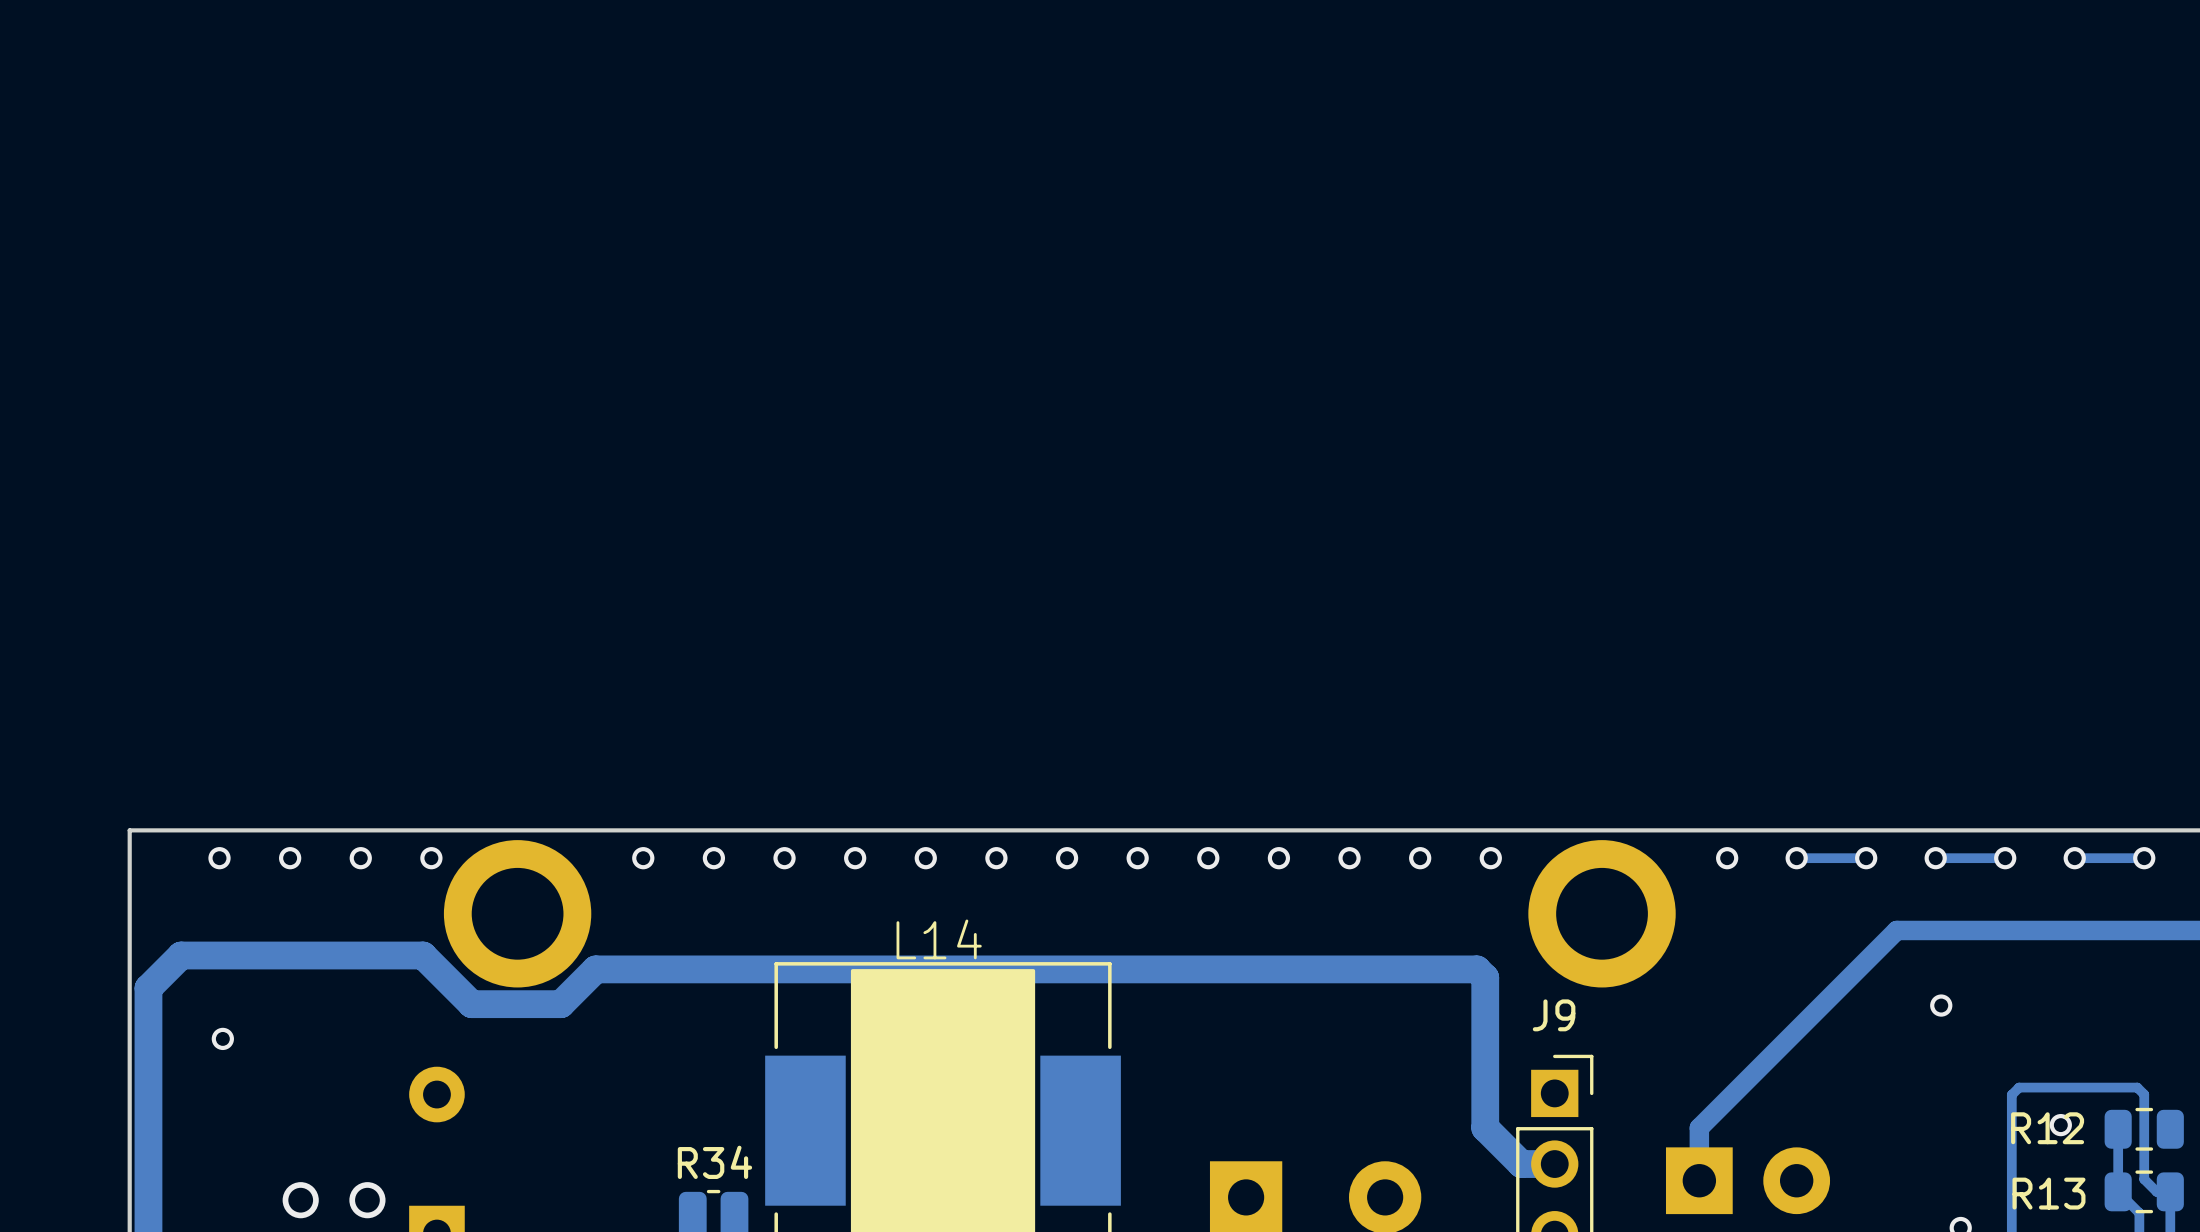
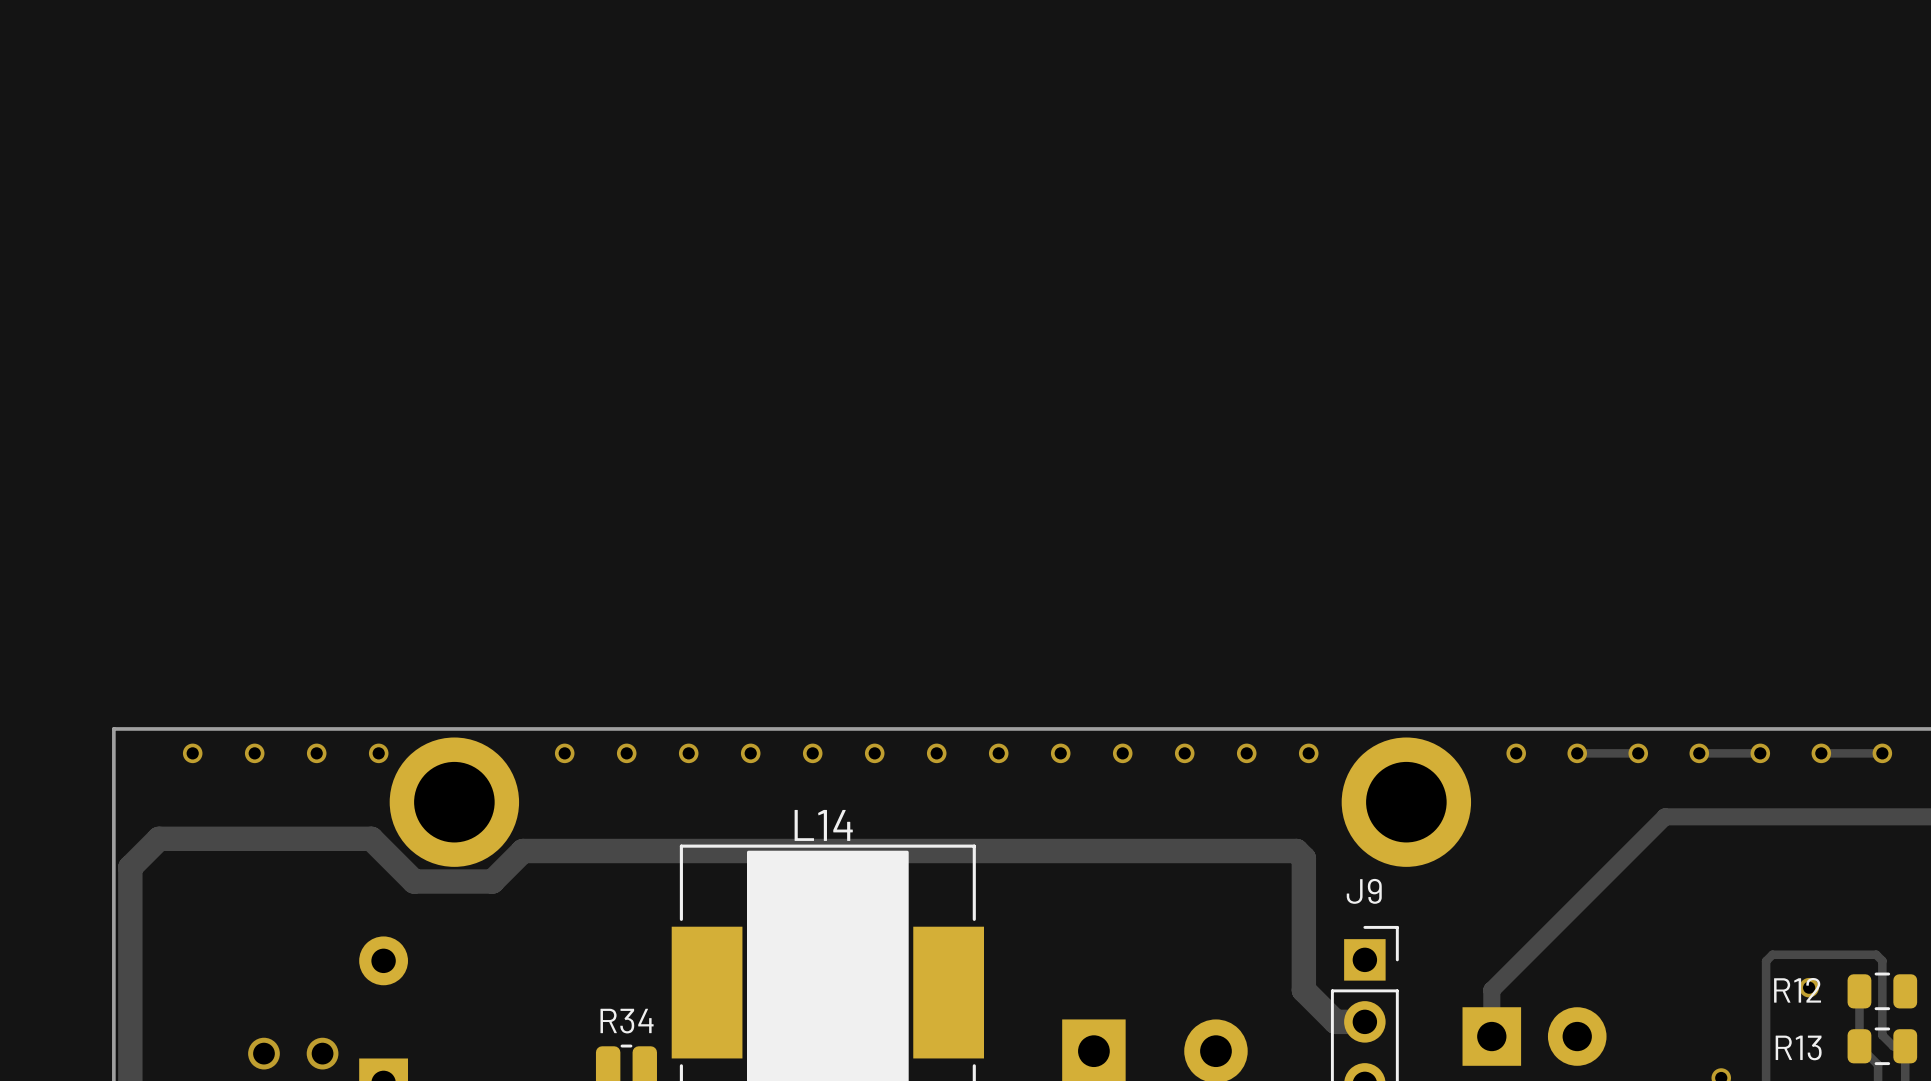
via: (1941, 1005) -> none
via: (222, 1038) -> none

